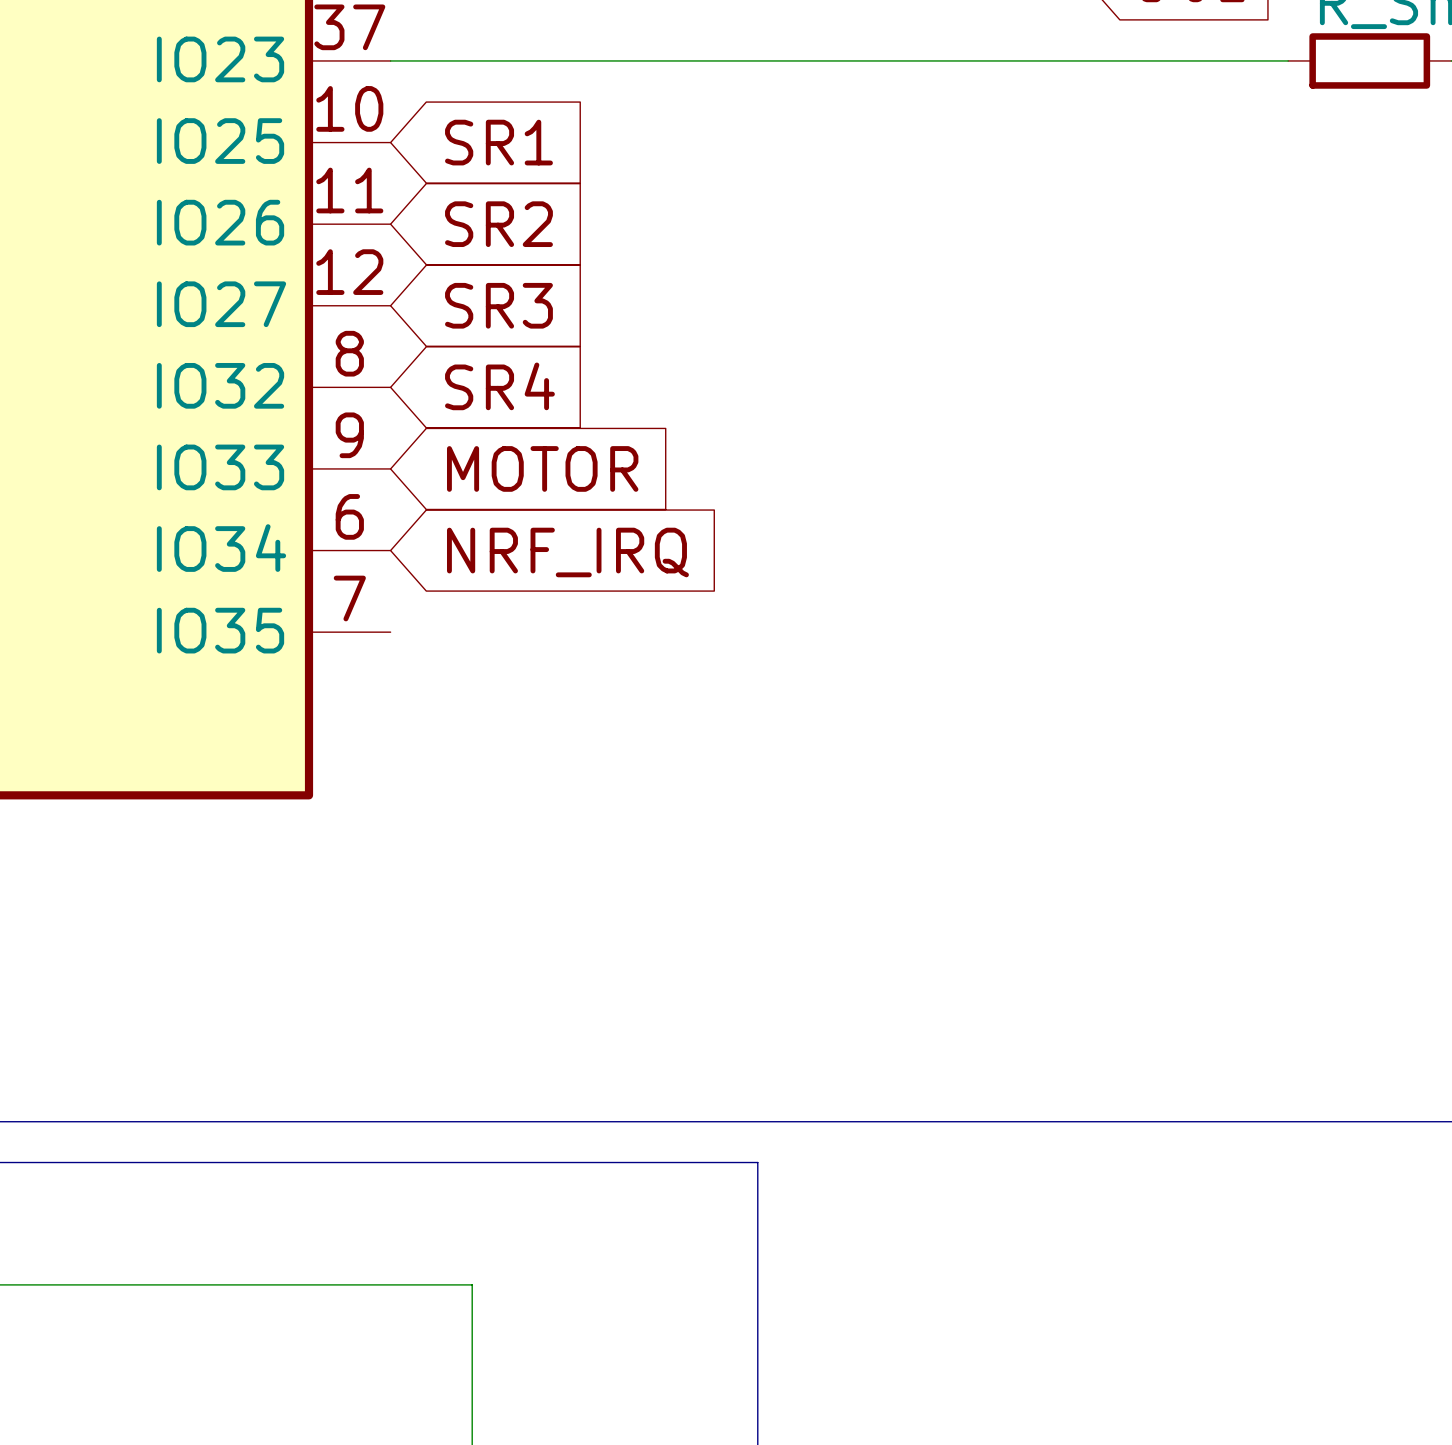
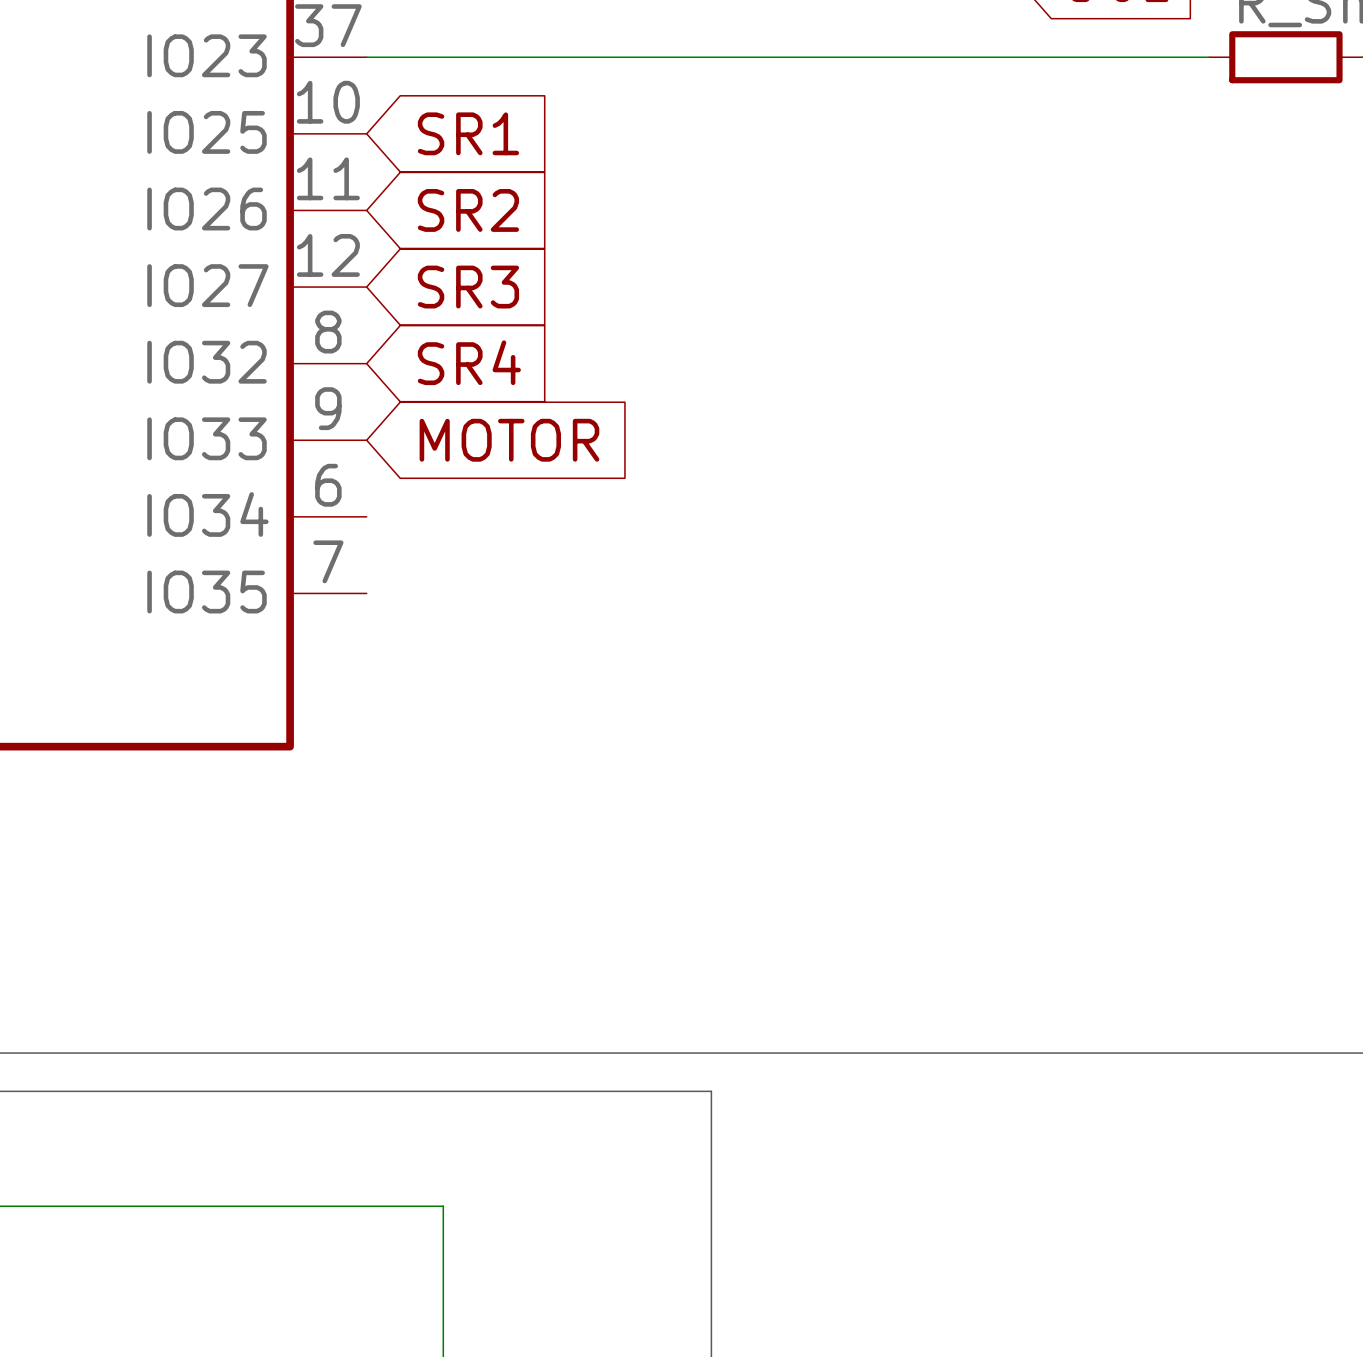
global label: NRF_IRQ (567, 552) -> none

